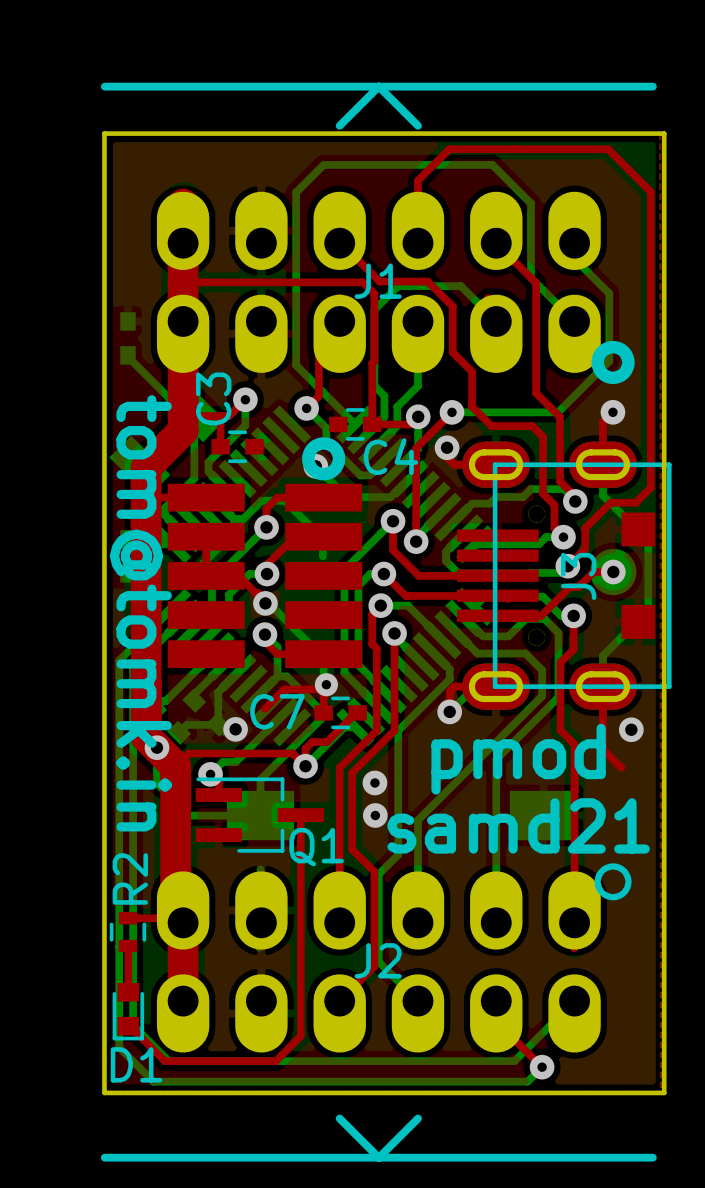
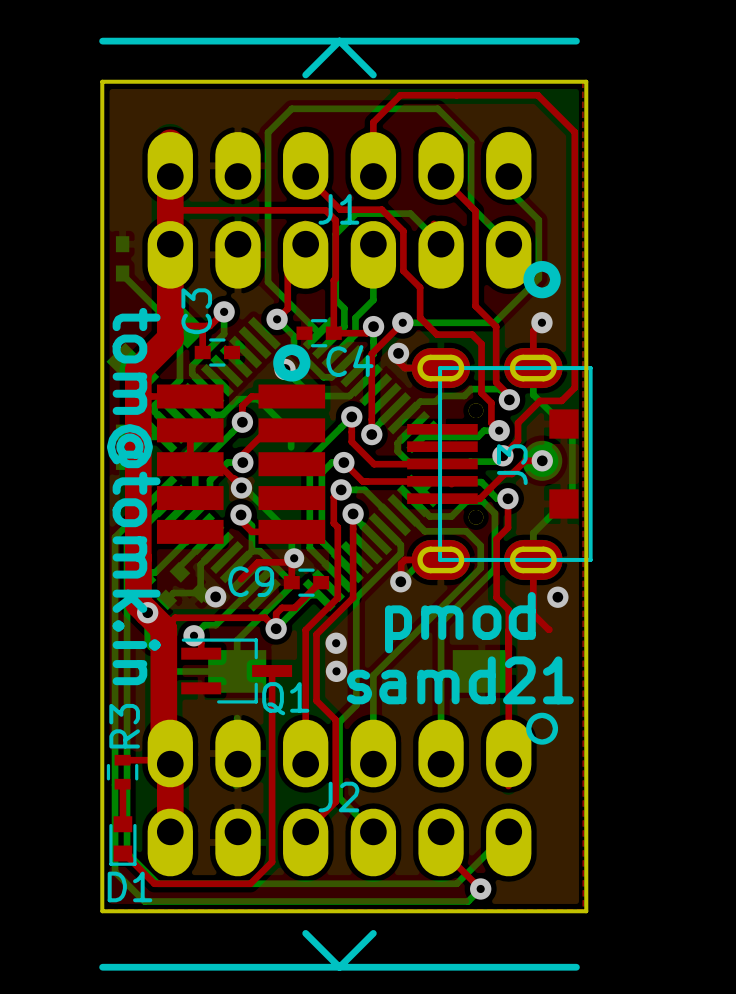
C7 name: C7 (277, 711) -> C9 (251, 581)
R2 name: R2 (130, 878) -> R3 (124, 726)

